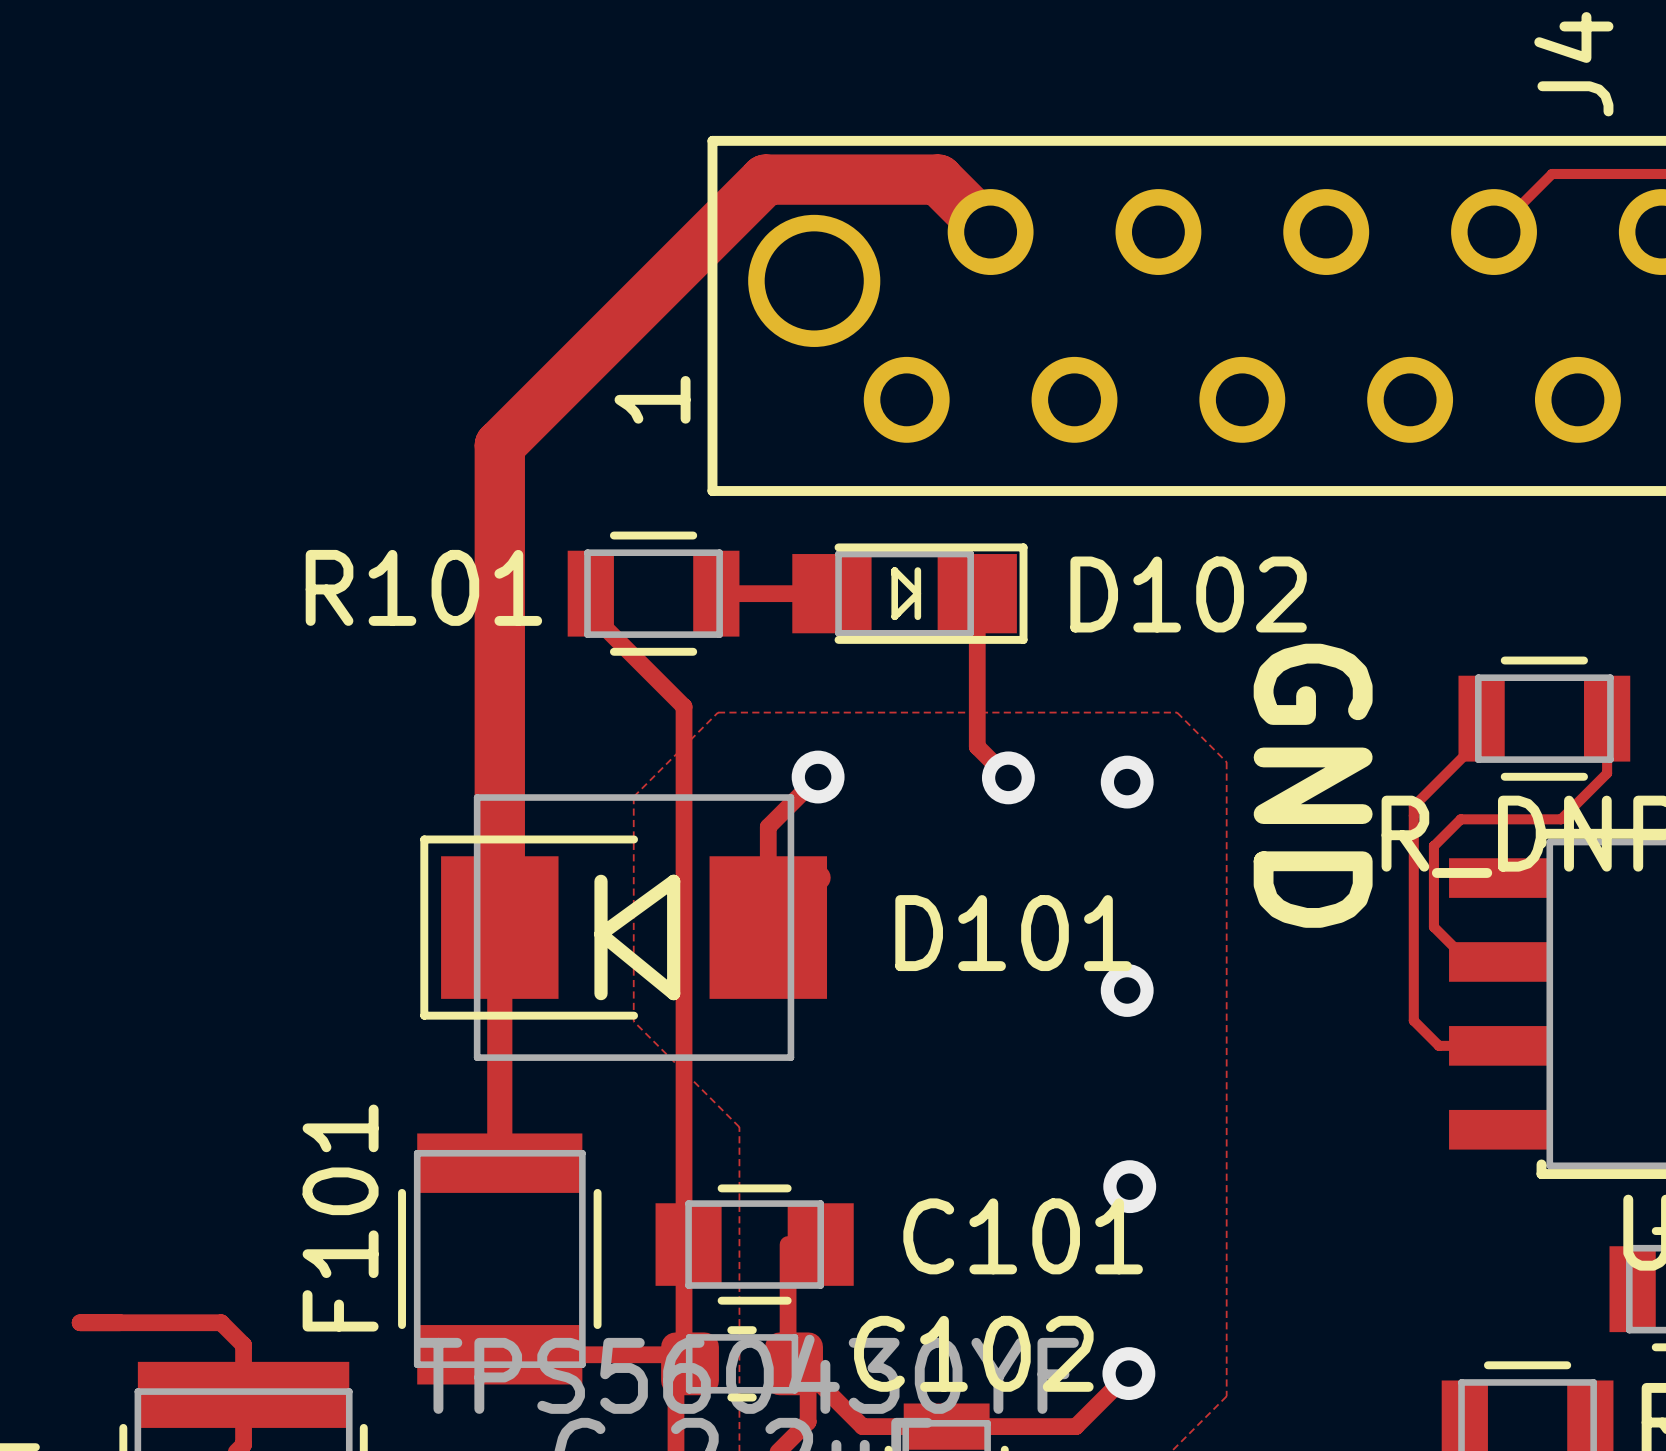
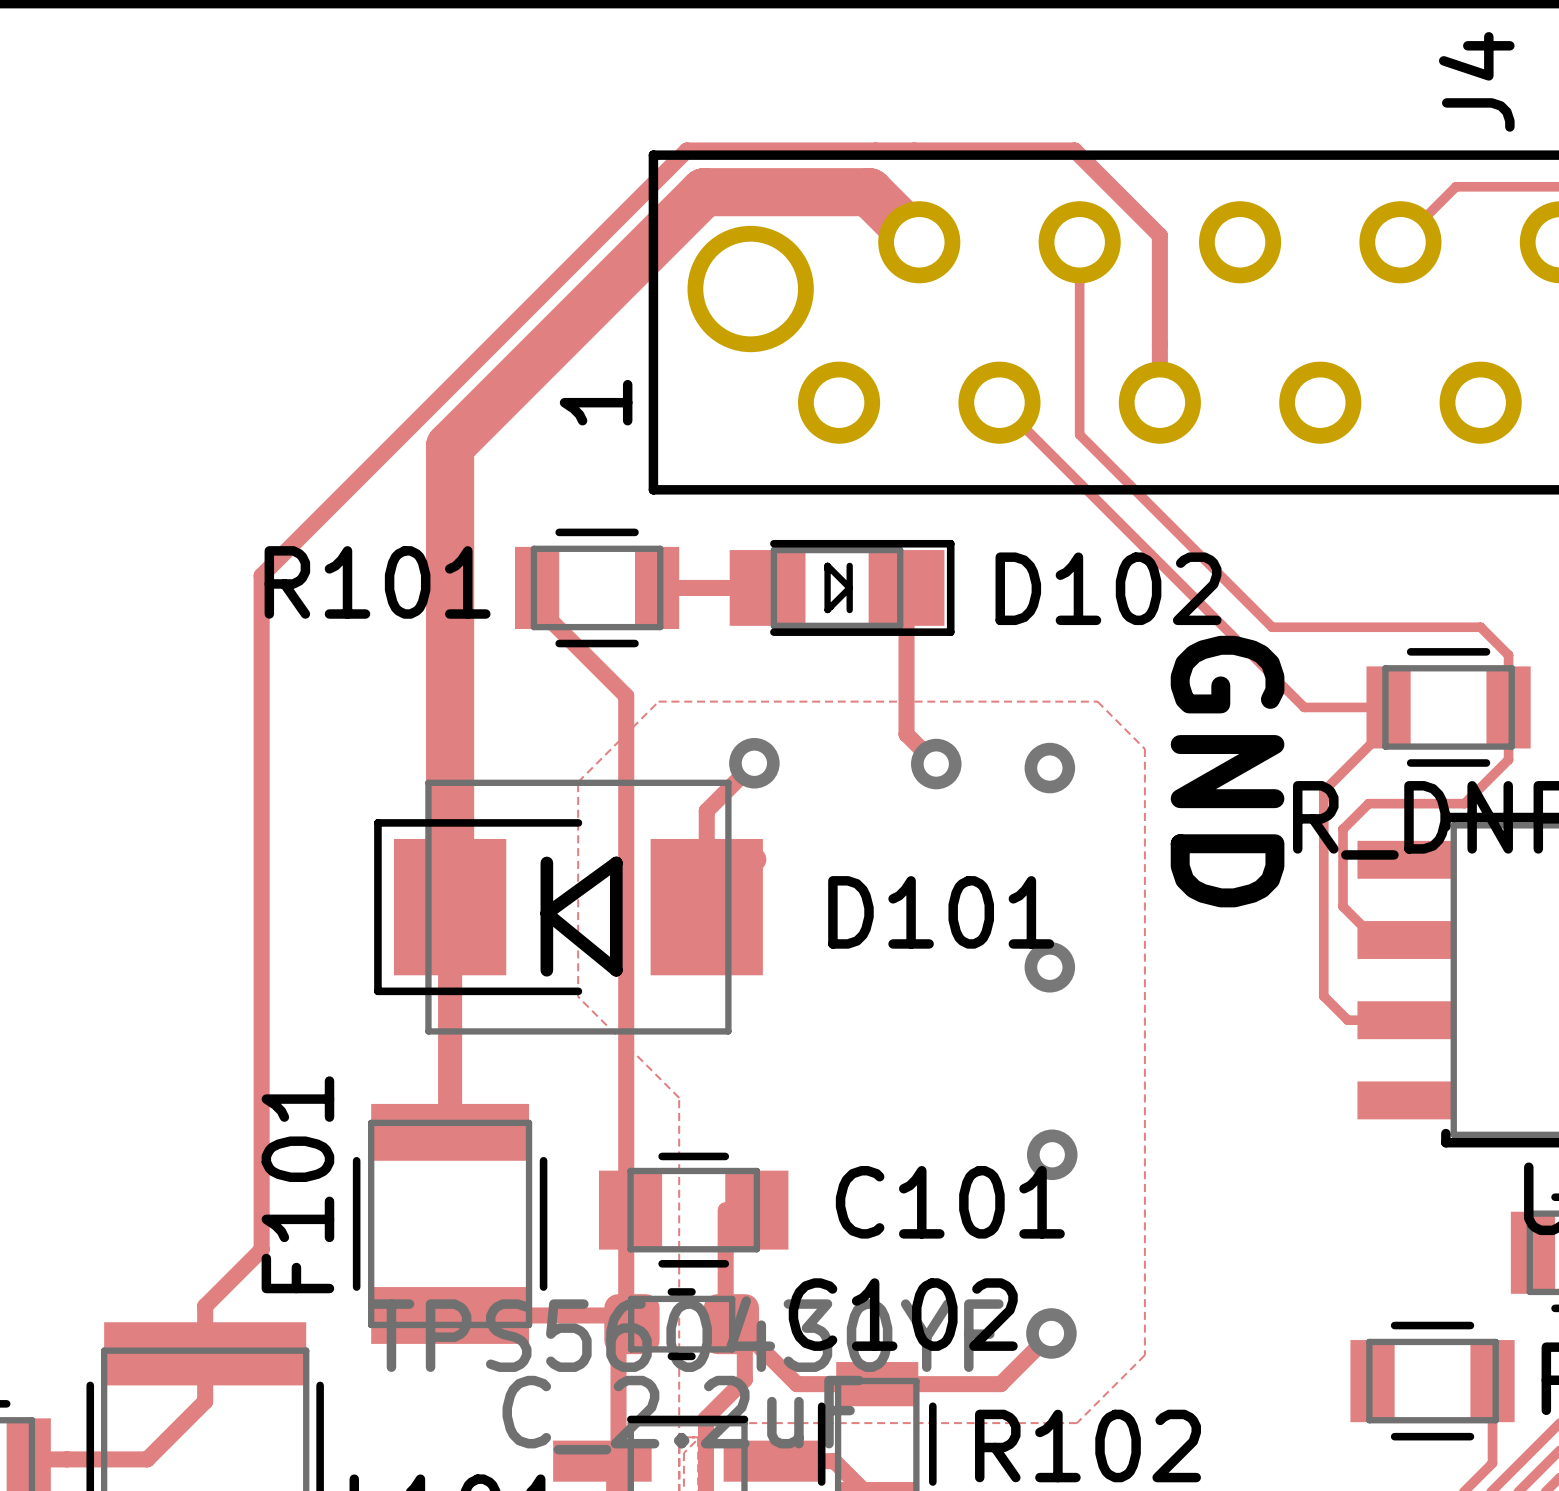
top track: none -> (1079, 242) (1079, 434) (1272, 627) (1480, 627) (1508, 655) (1508, 707)
top track: none -> (999, 402) (1304, 707) (1388, 707)
top track: (80, 1322) (221, 1322) (243, 1345) -> (1159, 402) (1159, 235) (1074, 150) (686, 150) (261, 575) (261, 1249) (205, 1306)

